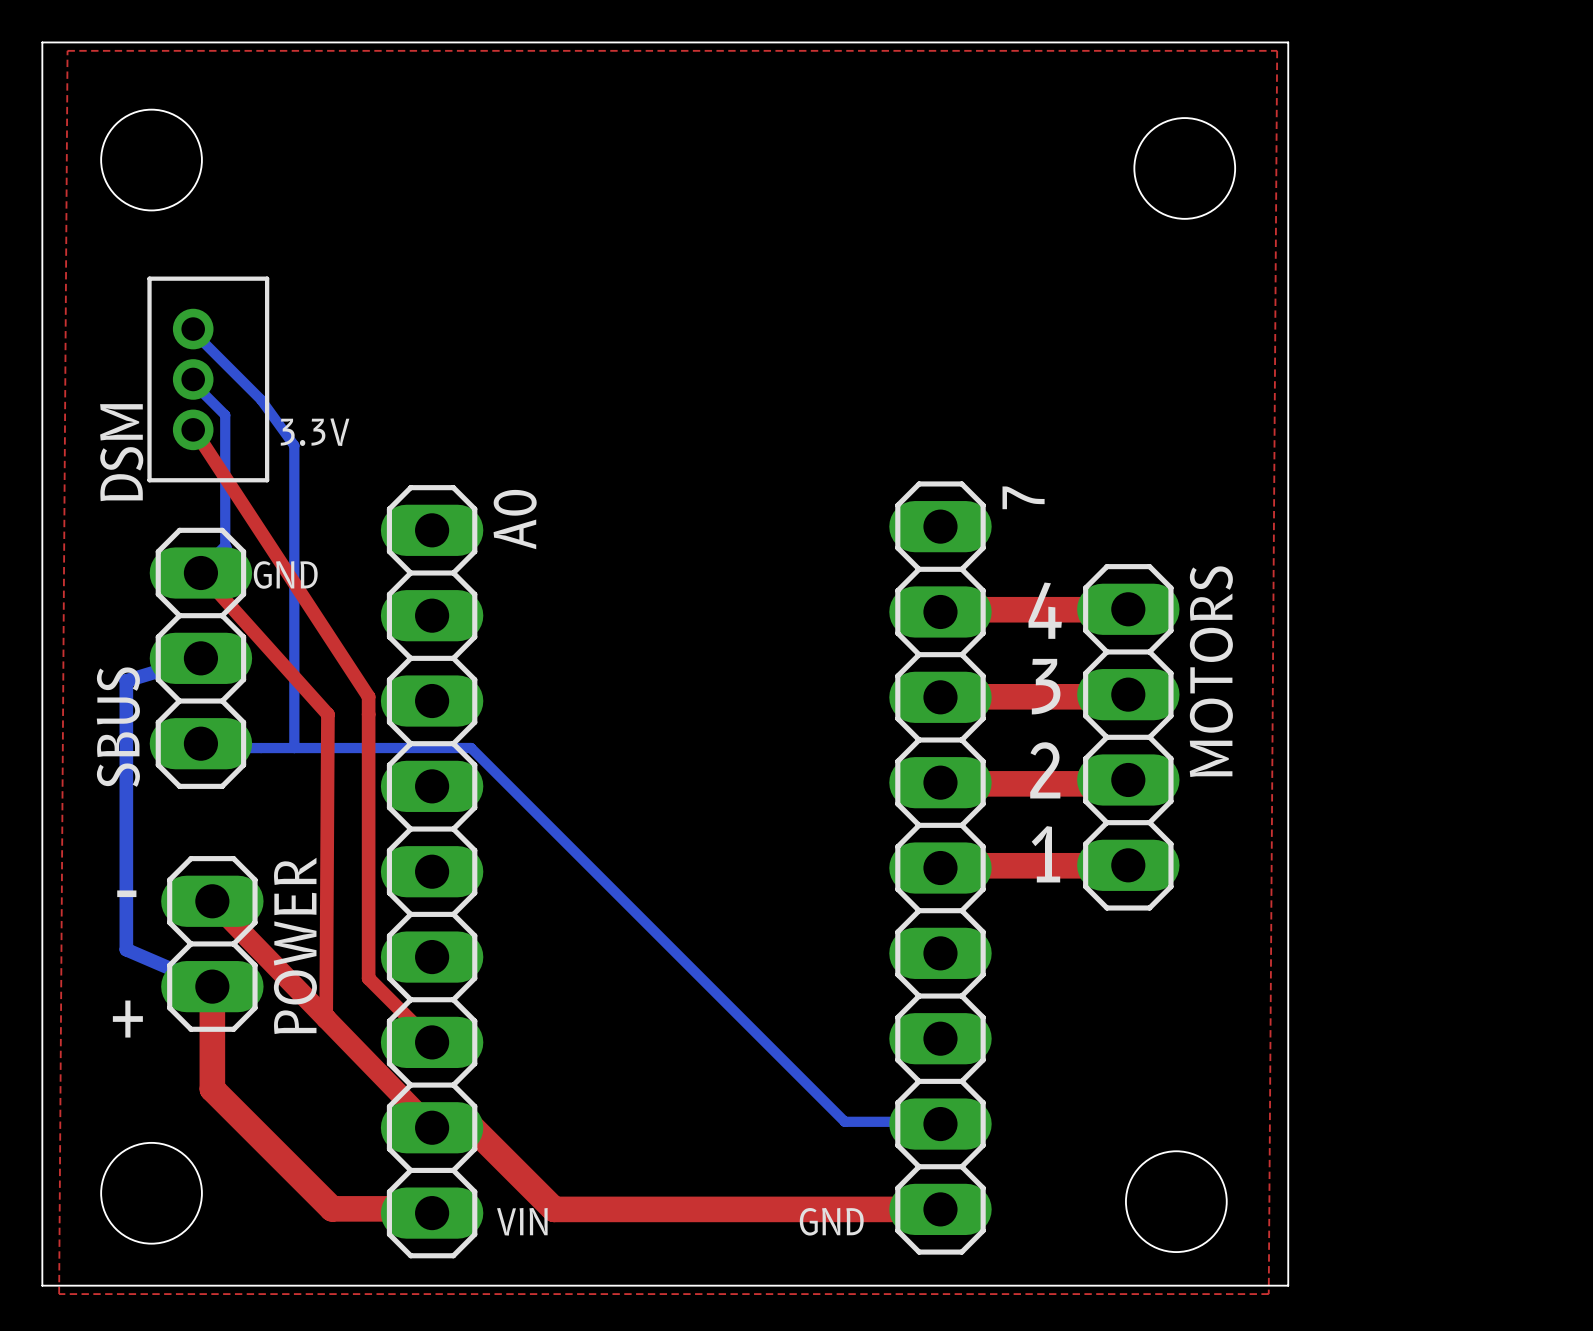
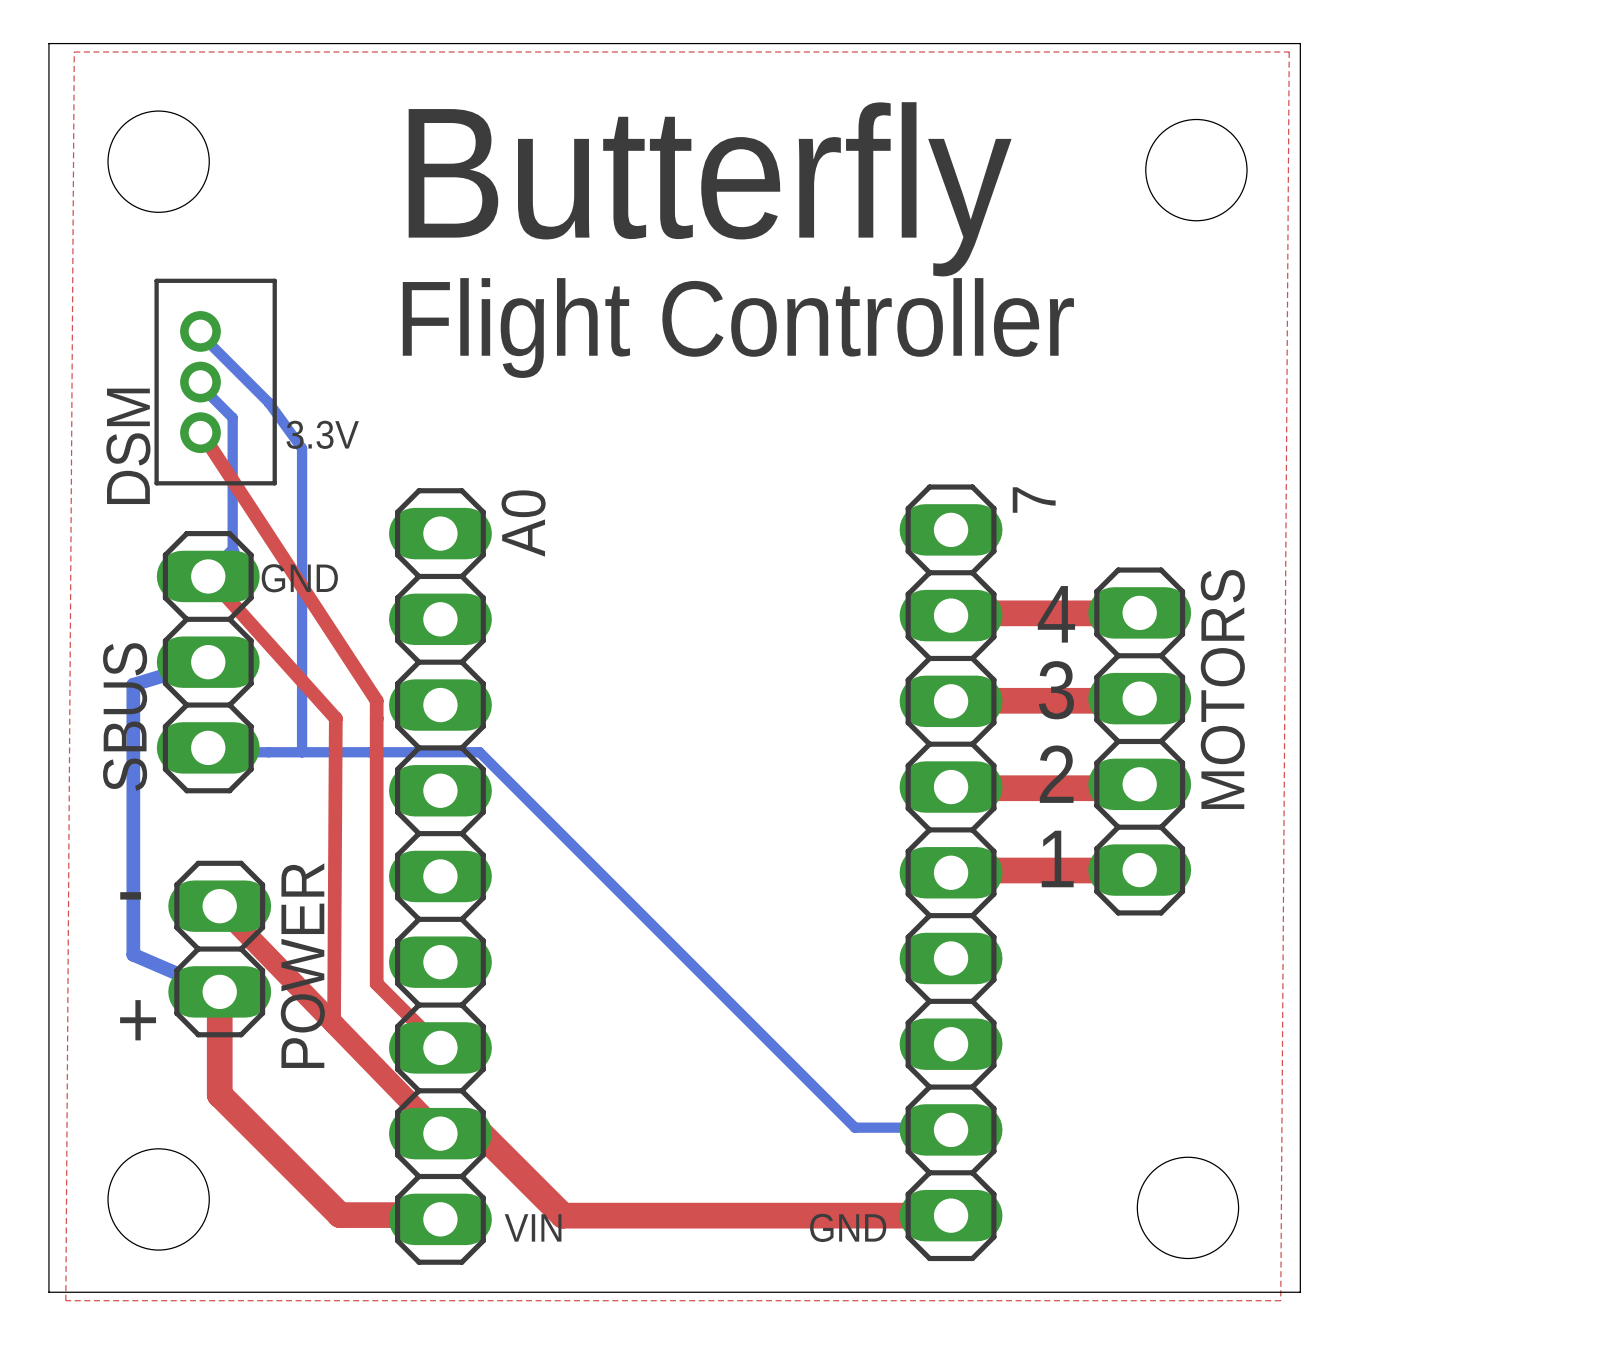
text: none -> Butterfly (710, 189)
text: none -> Flight Controller (738, 328)

